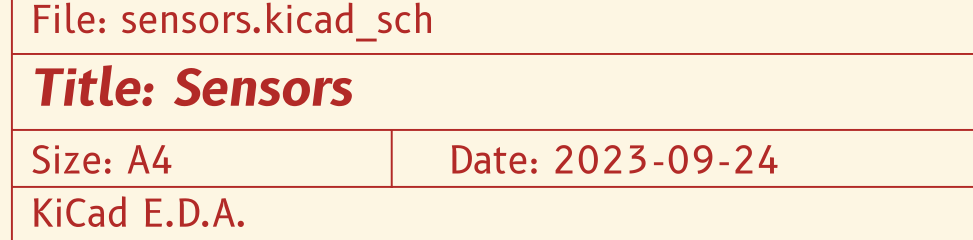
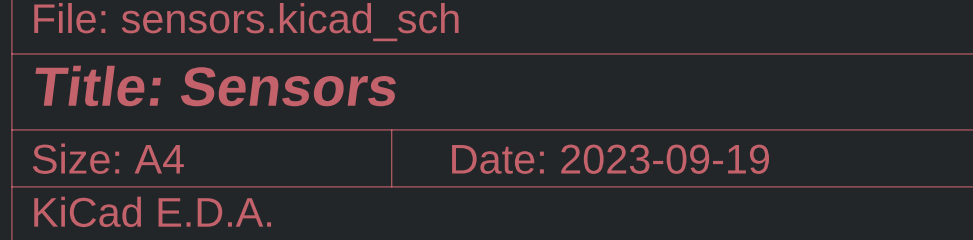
title block: Date: 2023-09-24 (614, 159) -> Date: 2023-09-19 (610, 159)

